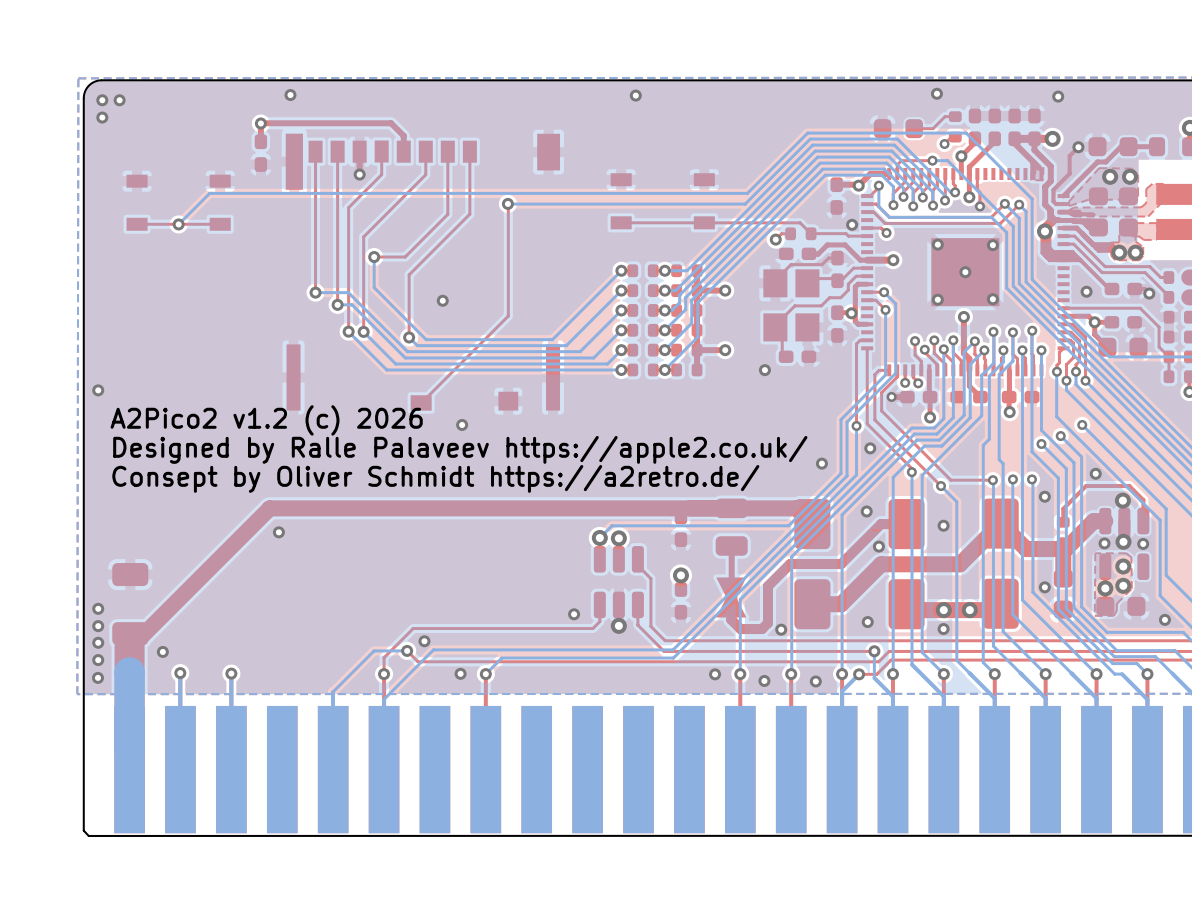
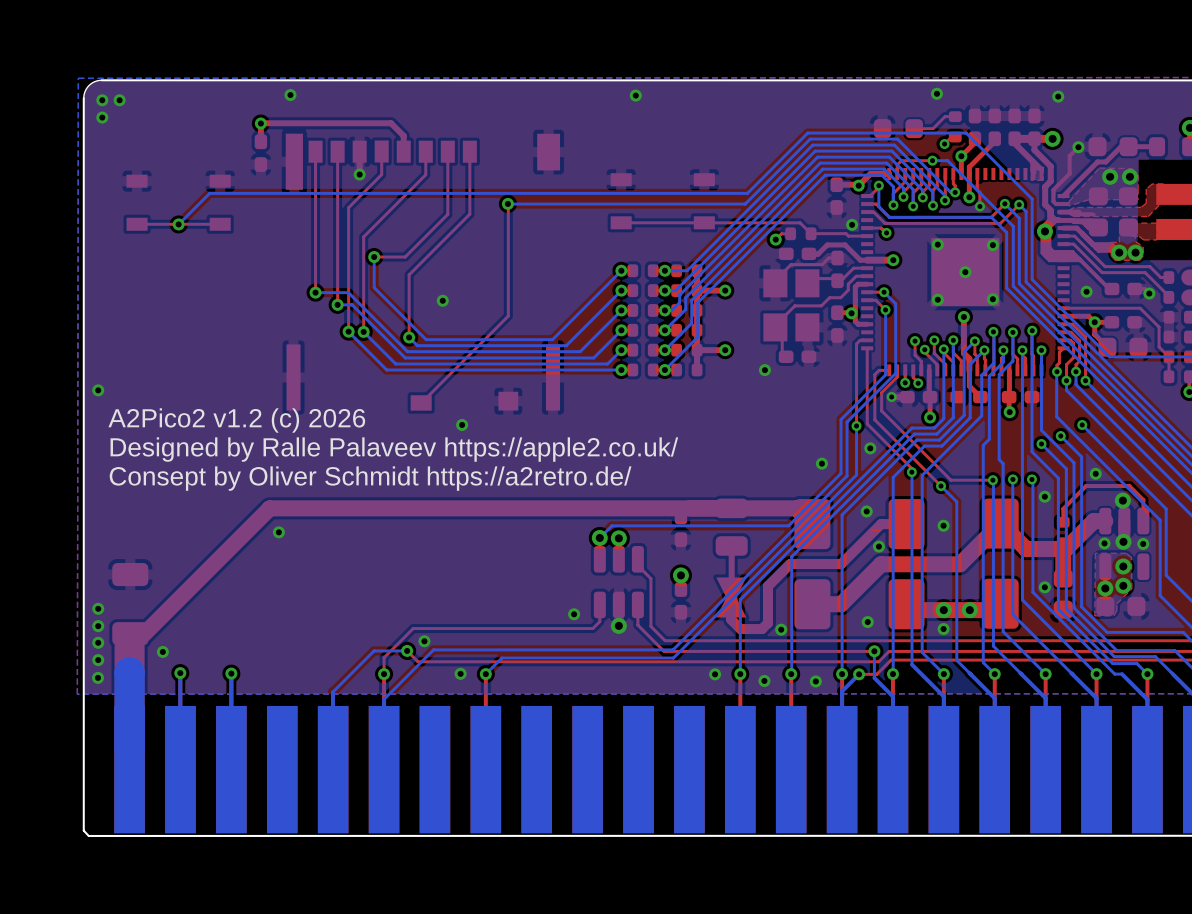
via: (1164, 619) -> none

